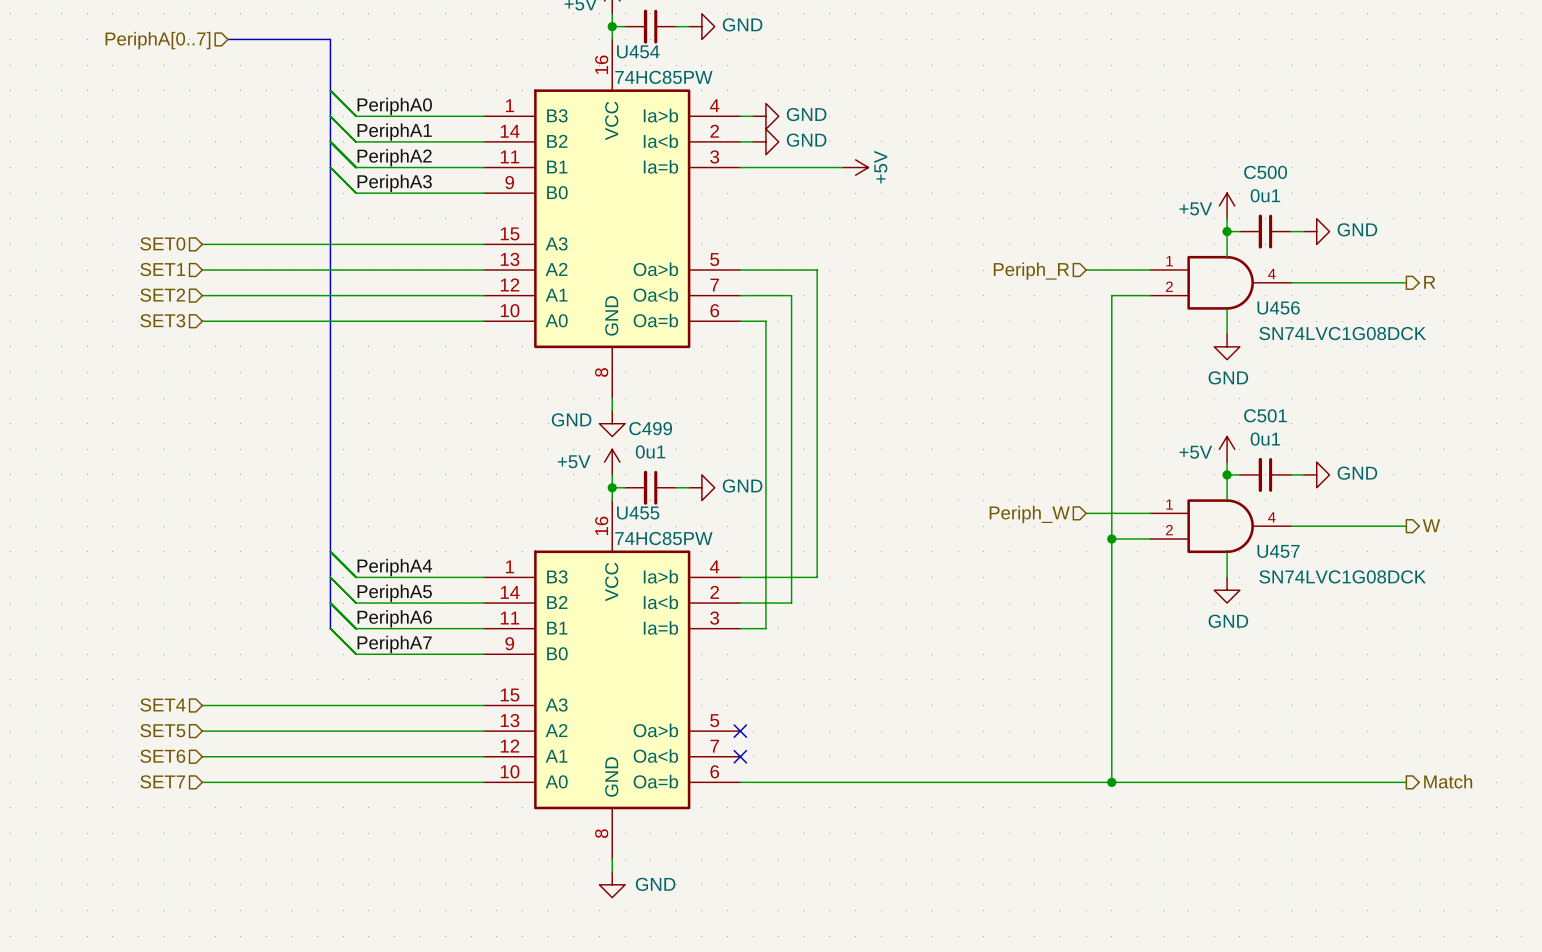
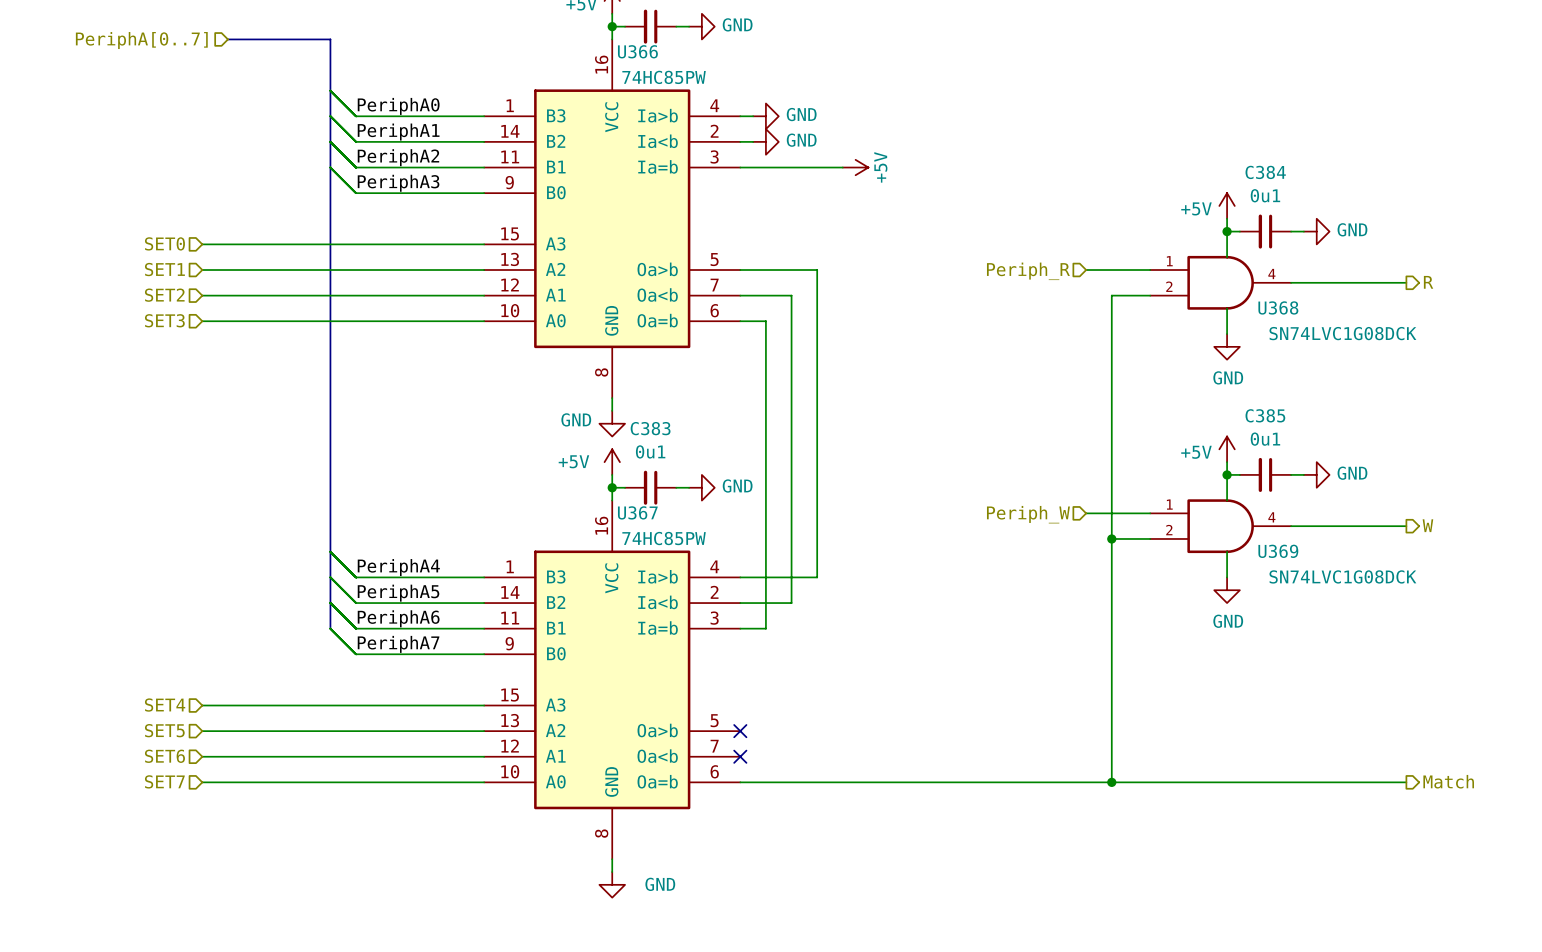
U454 name: U454 (638, 51) -> U366 (637, 51)
C500 name: C500 (1265, 172) -> C384 (1265, 172)
U456 name: U456 (1278, 307) -> U368 (1278, 307)
C501 name: C501 (1265, 415) -> C385 (1265, 415)
C499 name: C499 (650, 428) -> C383 (650, 428)
U455 name: U455 (638, 512) -> U367 (637, 512)
U457 name: U457 (1278, 551) -> U369 (1278, 551)

